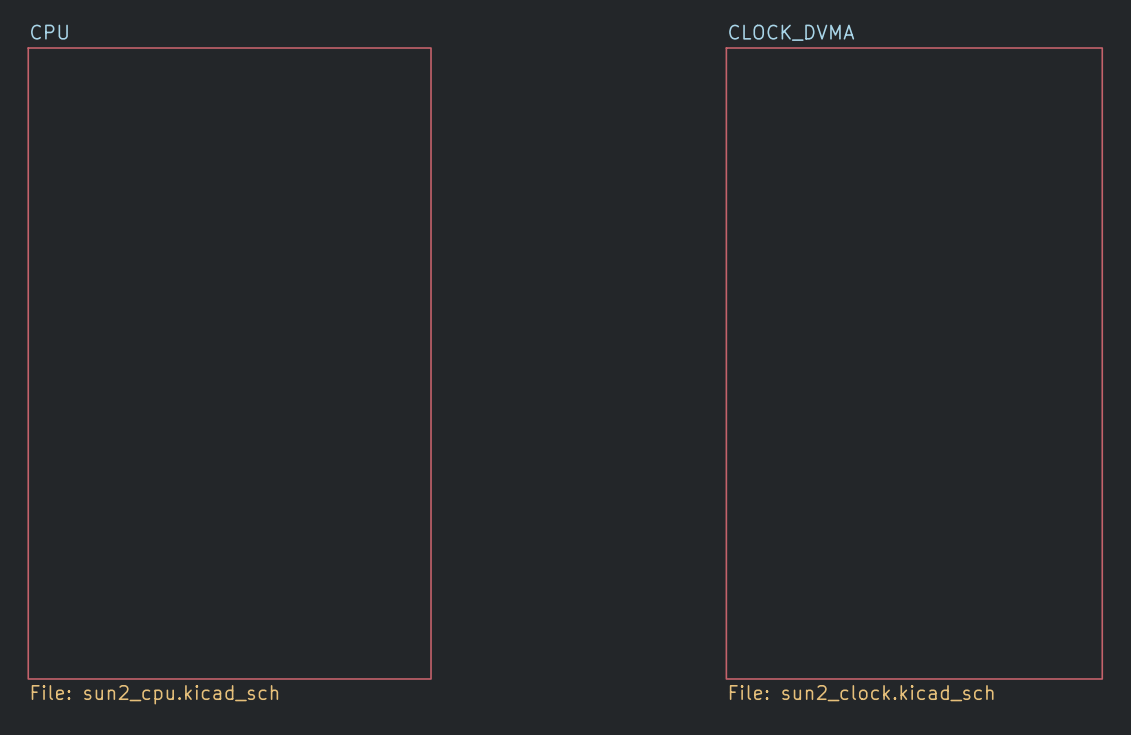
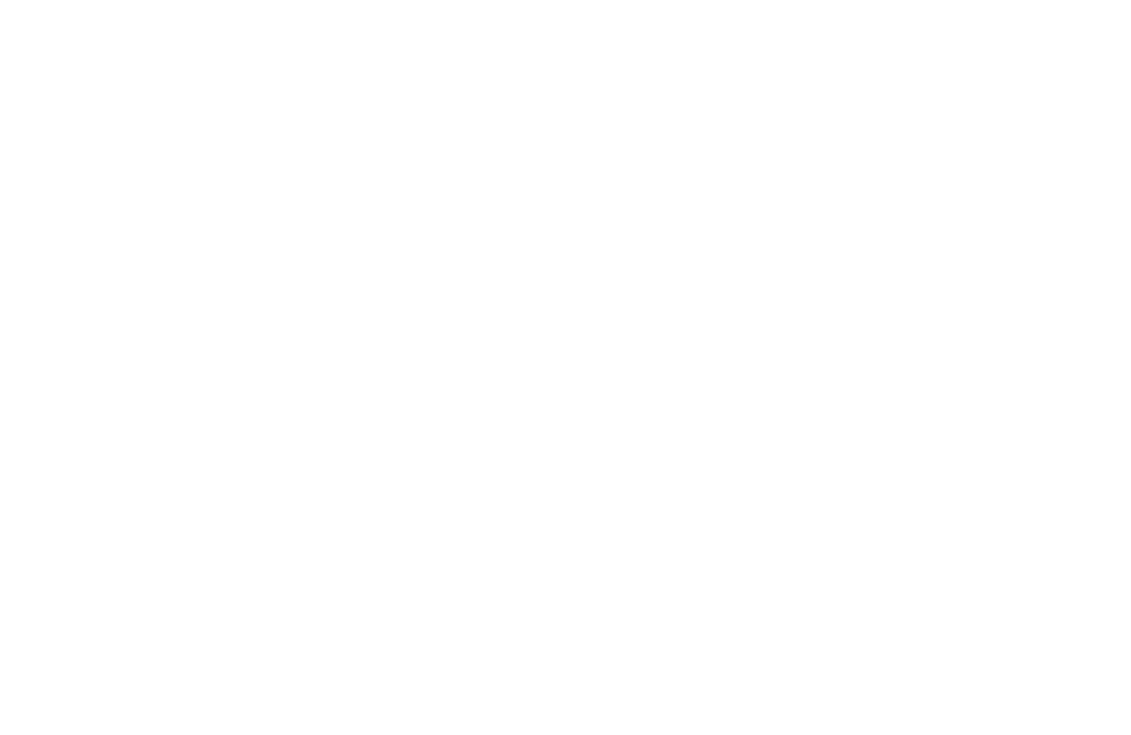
sheet CPU: File: sun2_cpu.kicad_sch (229, 363) -> none
sheet CLOCK_DVMA: File: sun2_clock.kicad_sch (914, 363) -> none

